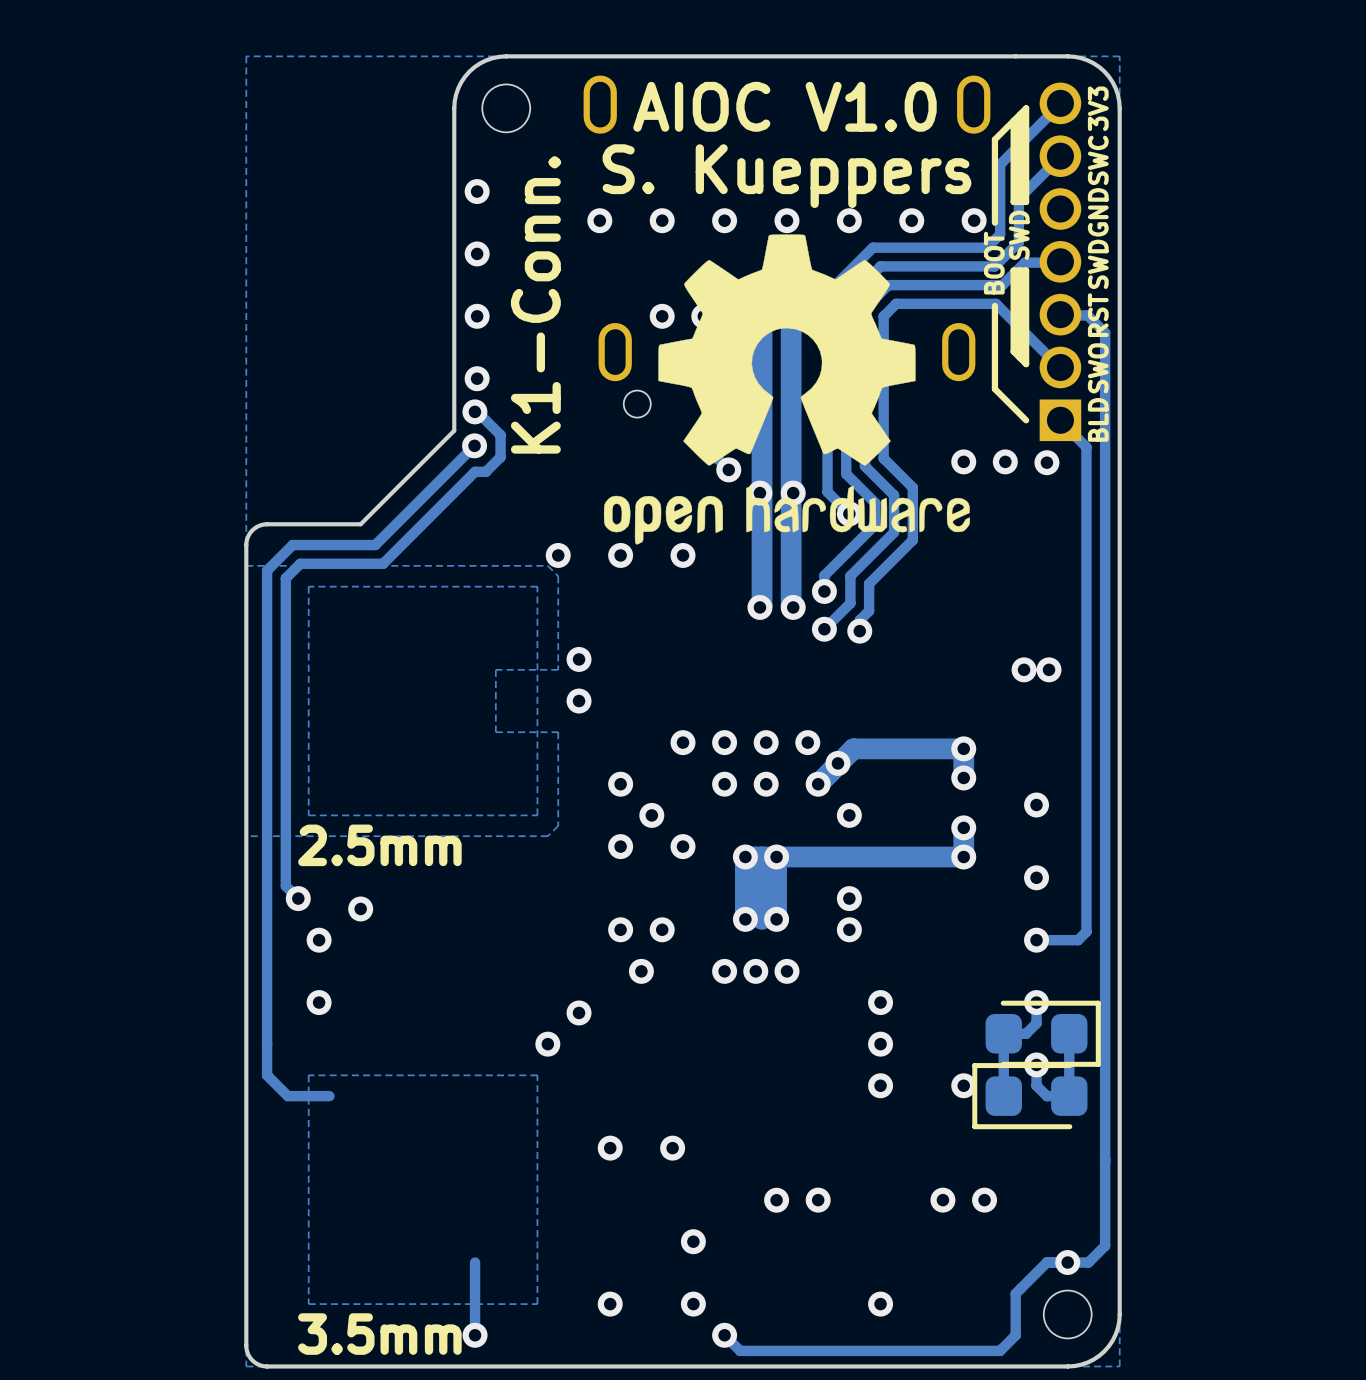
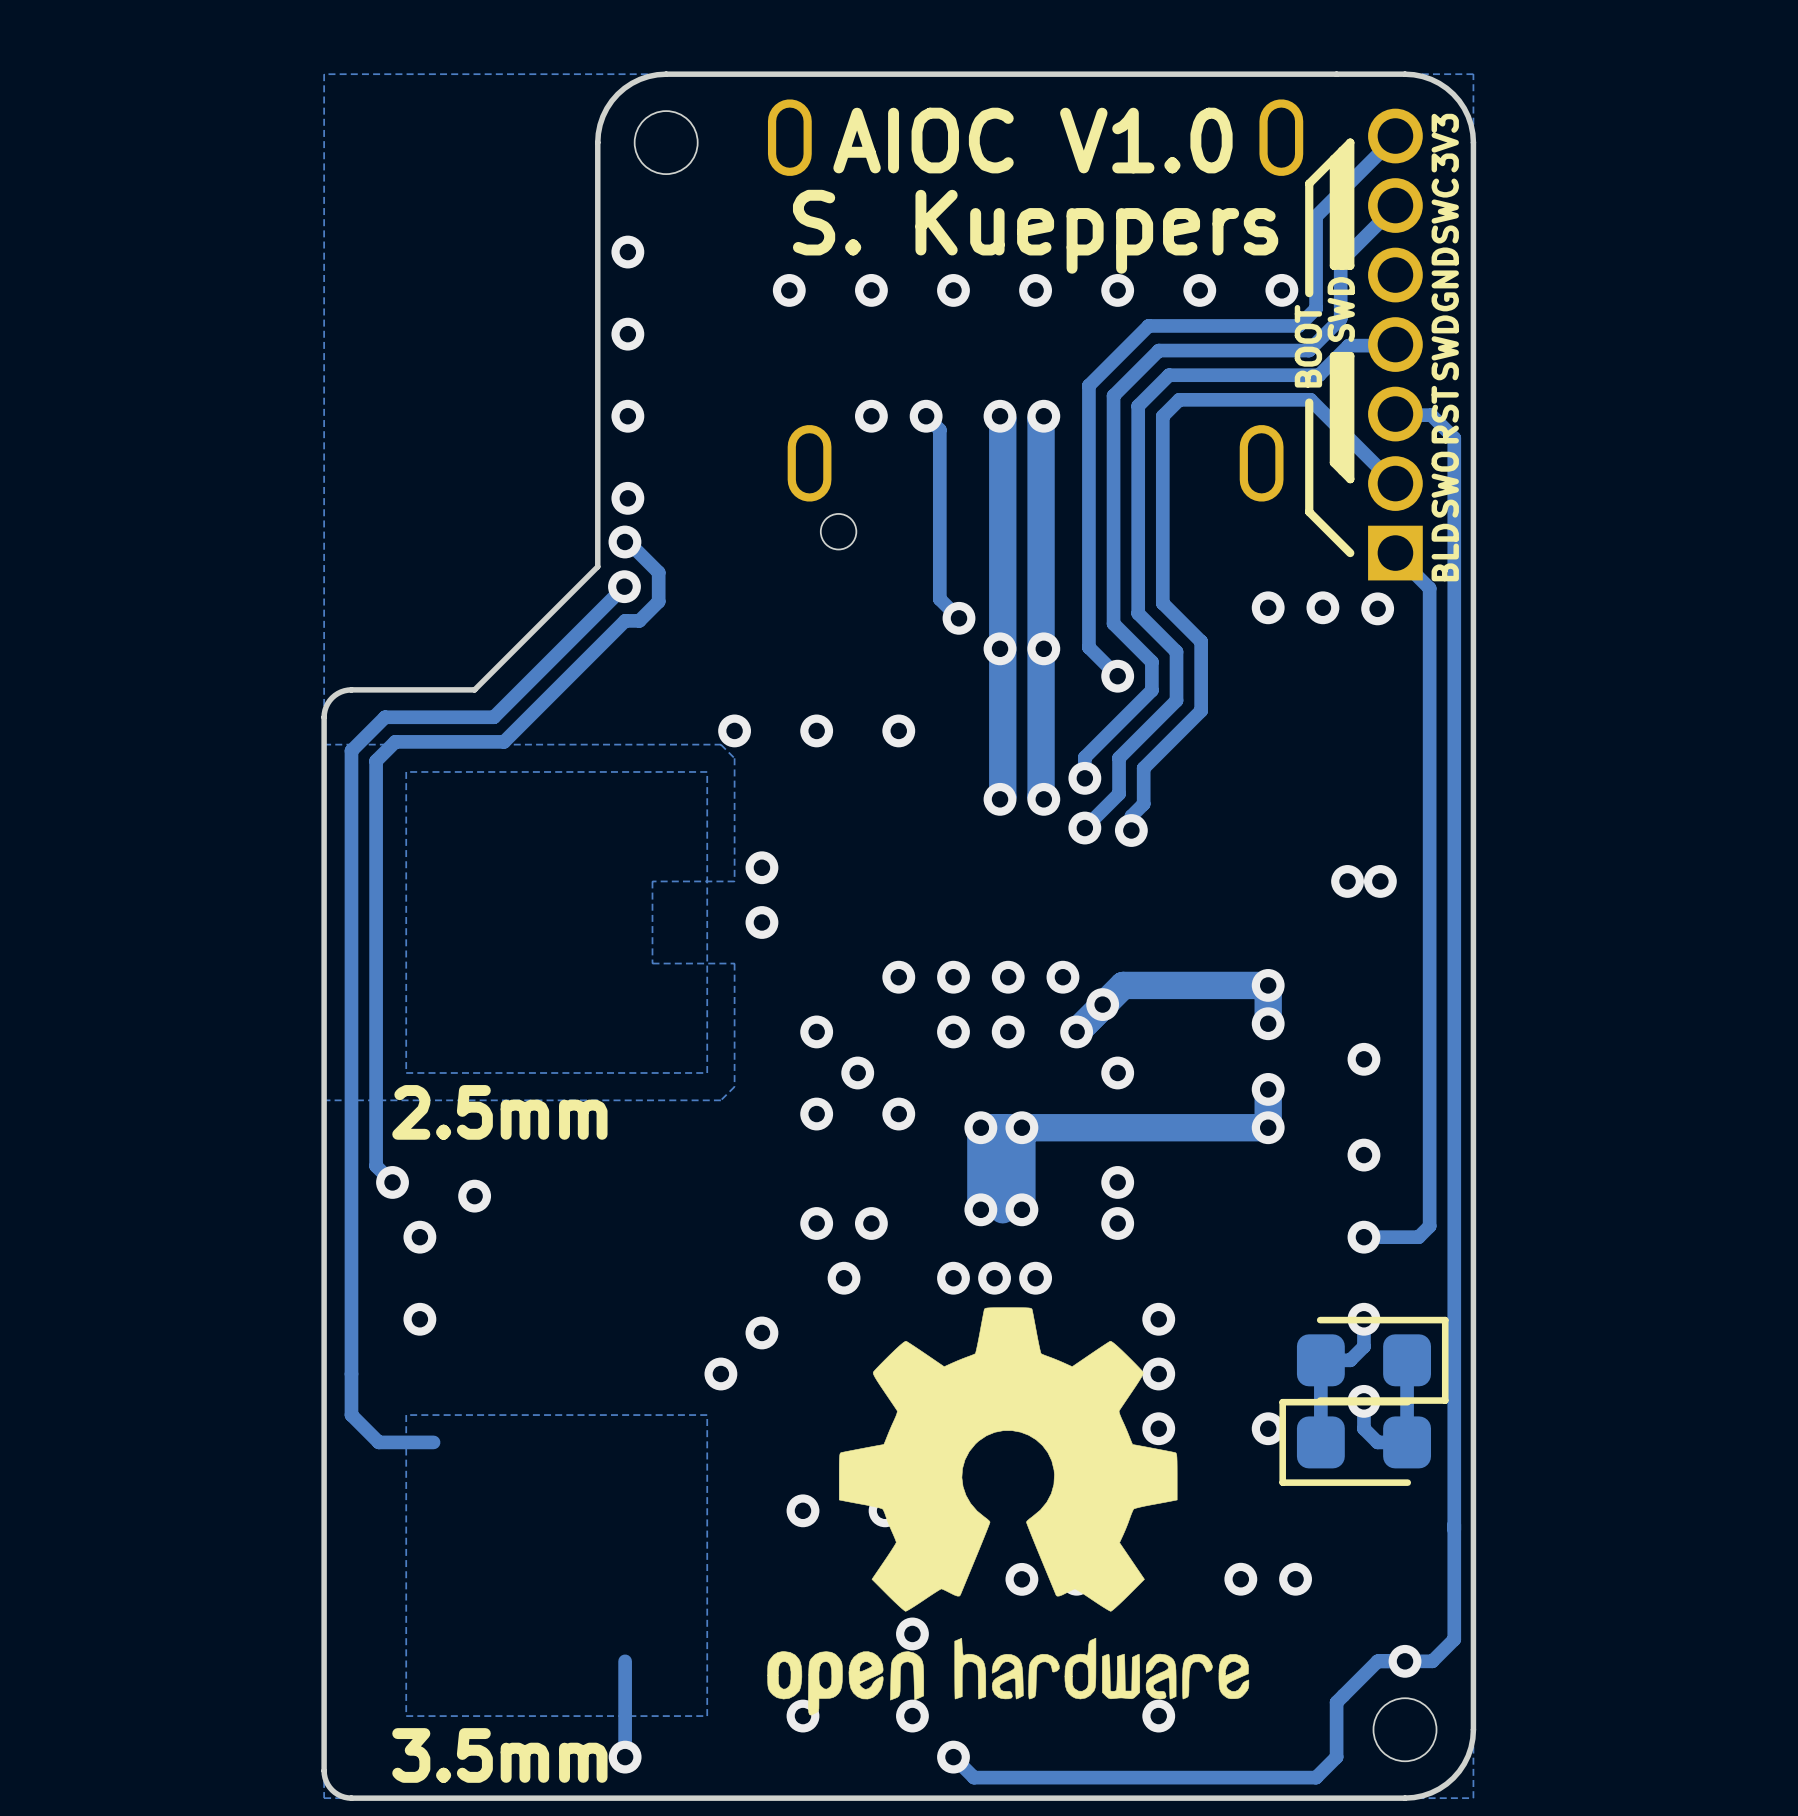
text: K1-Conn. (535, 304) -> none
drawing position: (786, 389) -> (1008, 1511)

